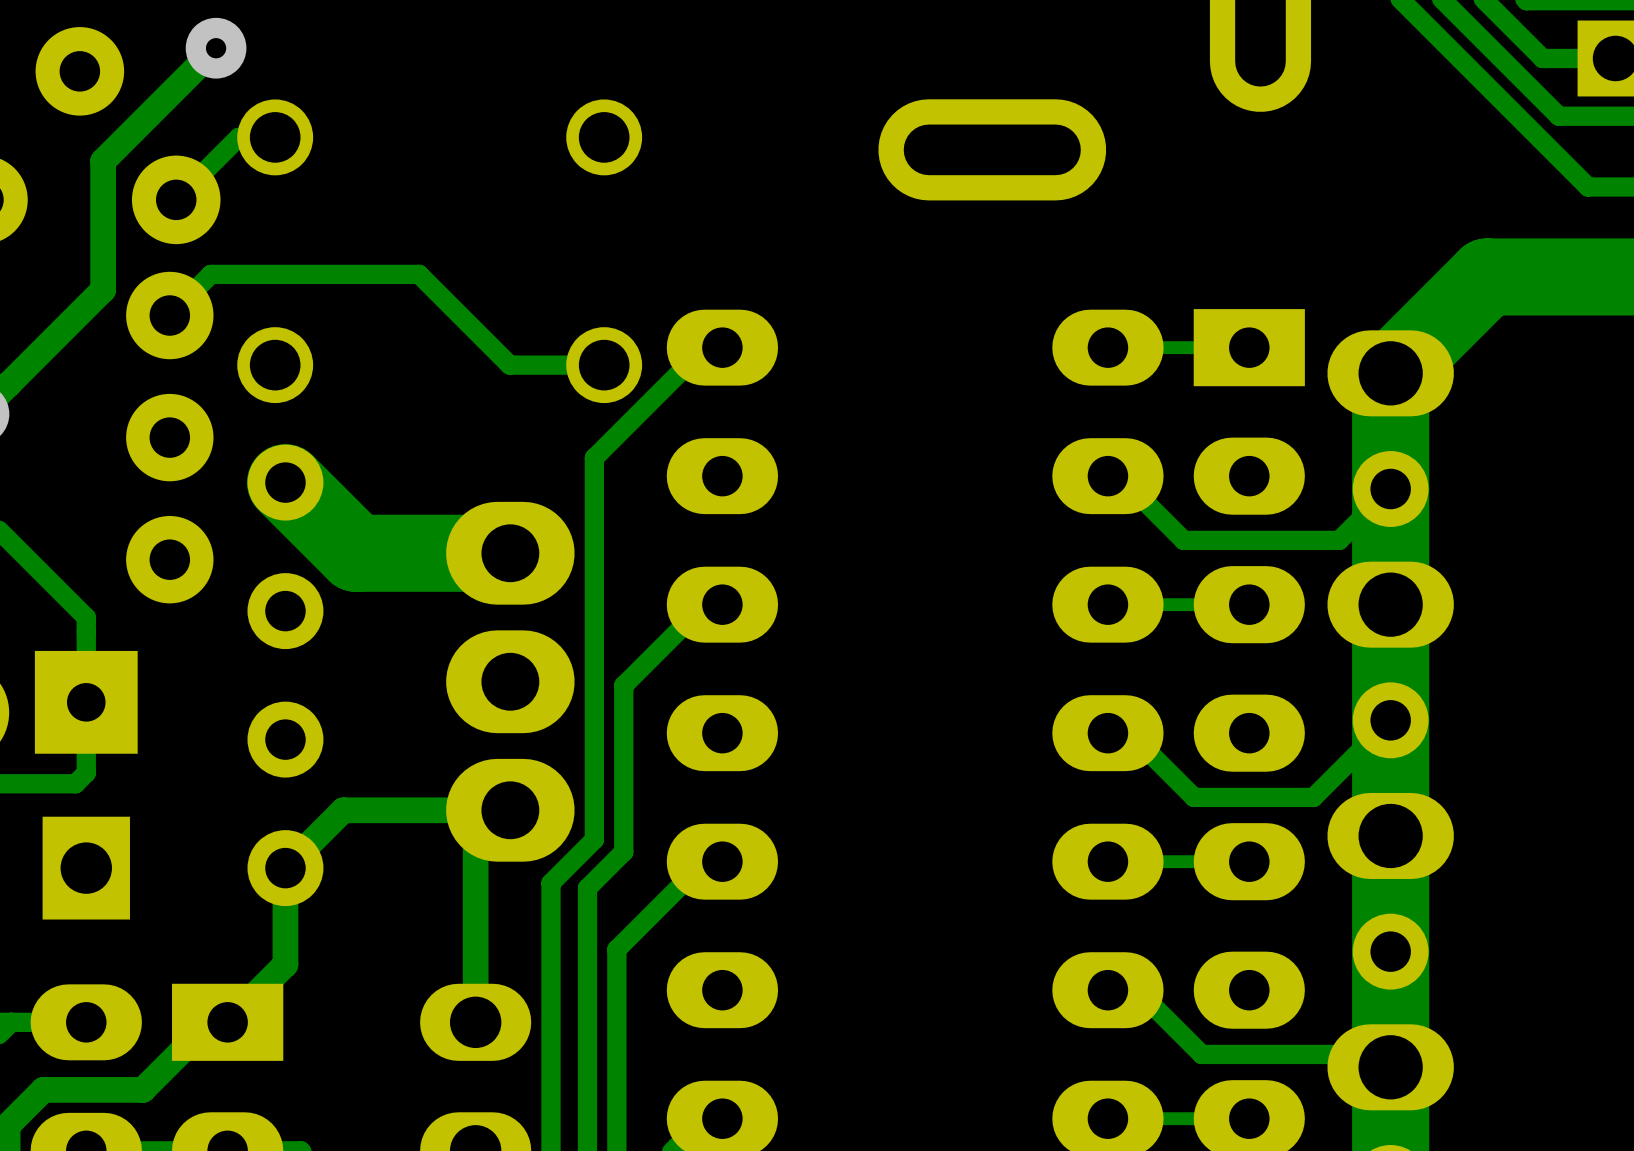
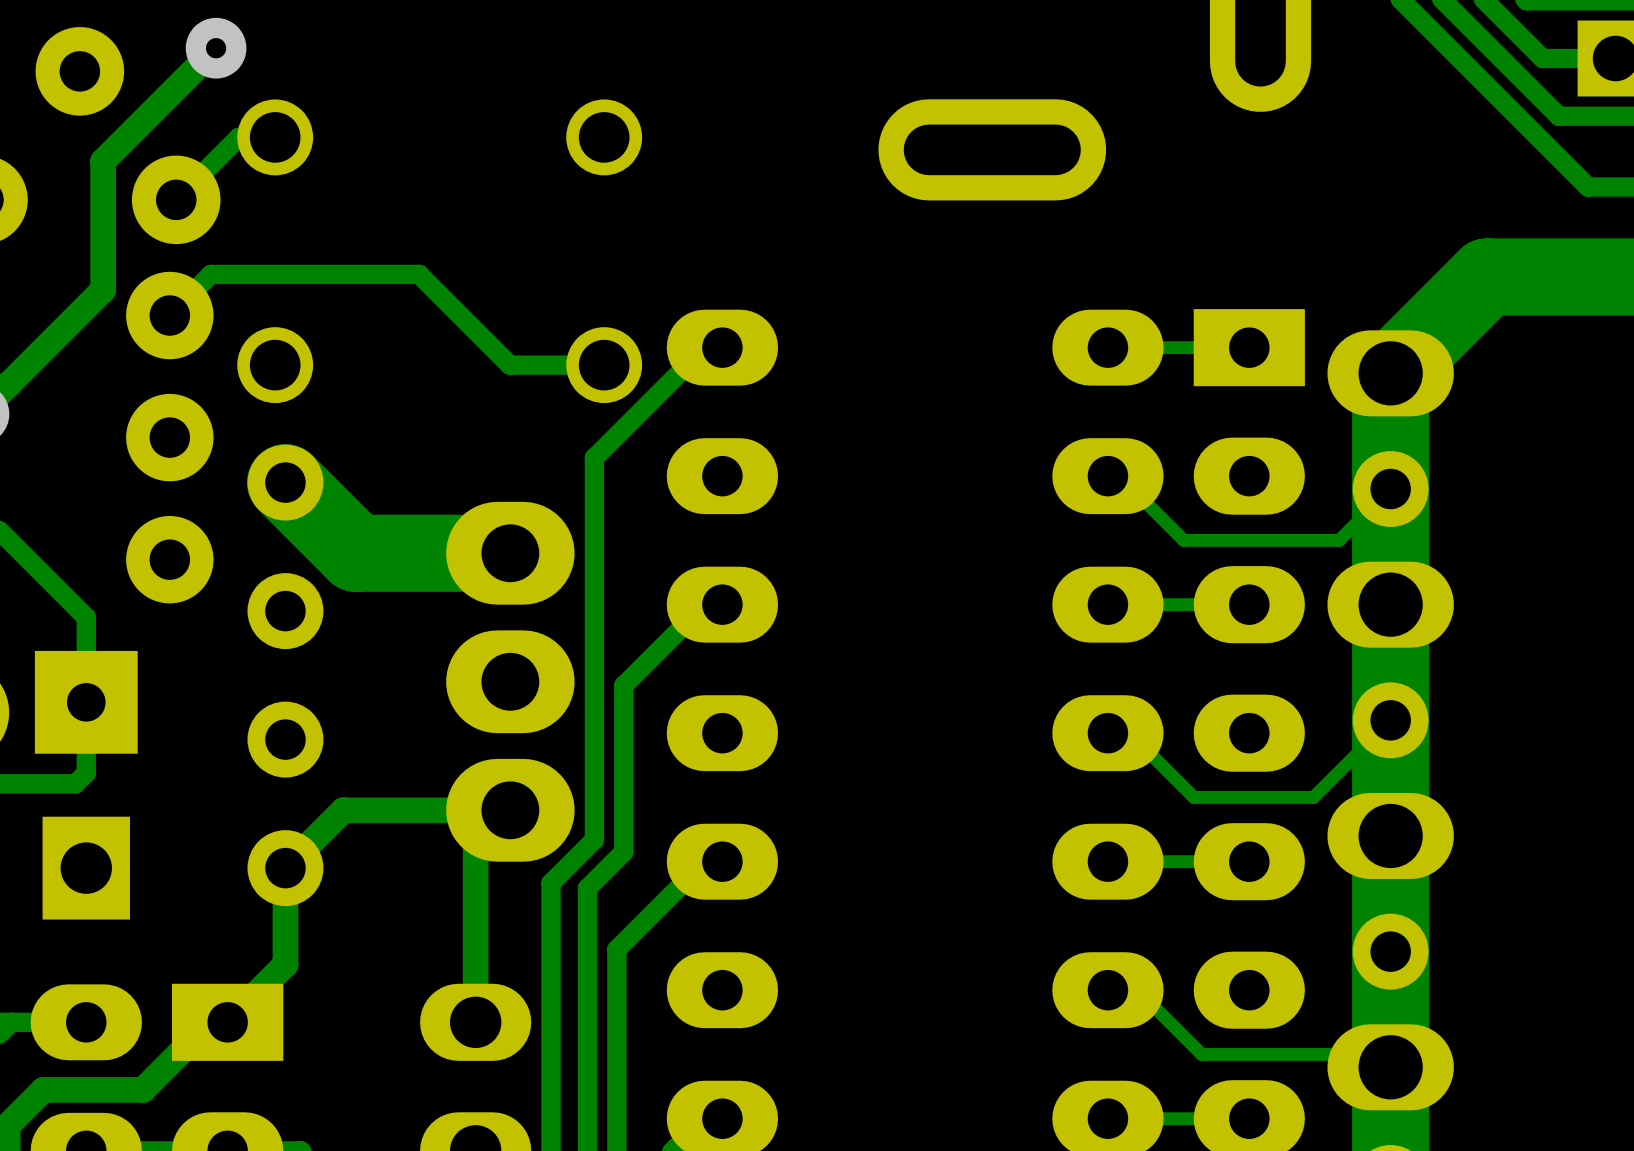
track width: thick (1119, 476) (1183, 540) (1339, 540) (1390, 489) -> thin (1119, 476) (1183, 540) (1339, 540) (1390, 489)
track width: thick (1390, 720) (1313, 797) (1194, 797) (1129, 733) -> thin (1390, 720) (1313, 797) (1194, 797) (1129, 733)
track width: thick (1137, 990) (1201, 1054) (1377, 1054) -> thin (1137, 990) (1201, 1054) (1377, 1054)

